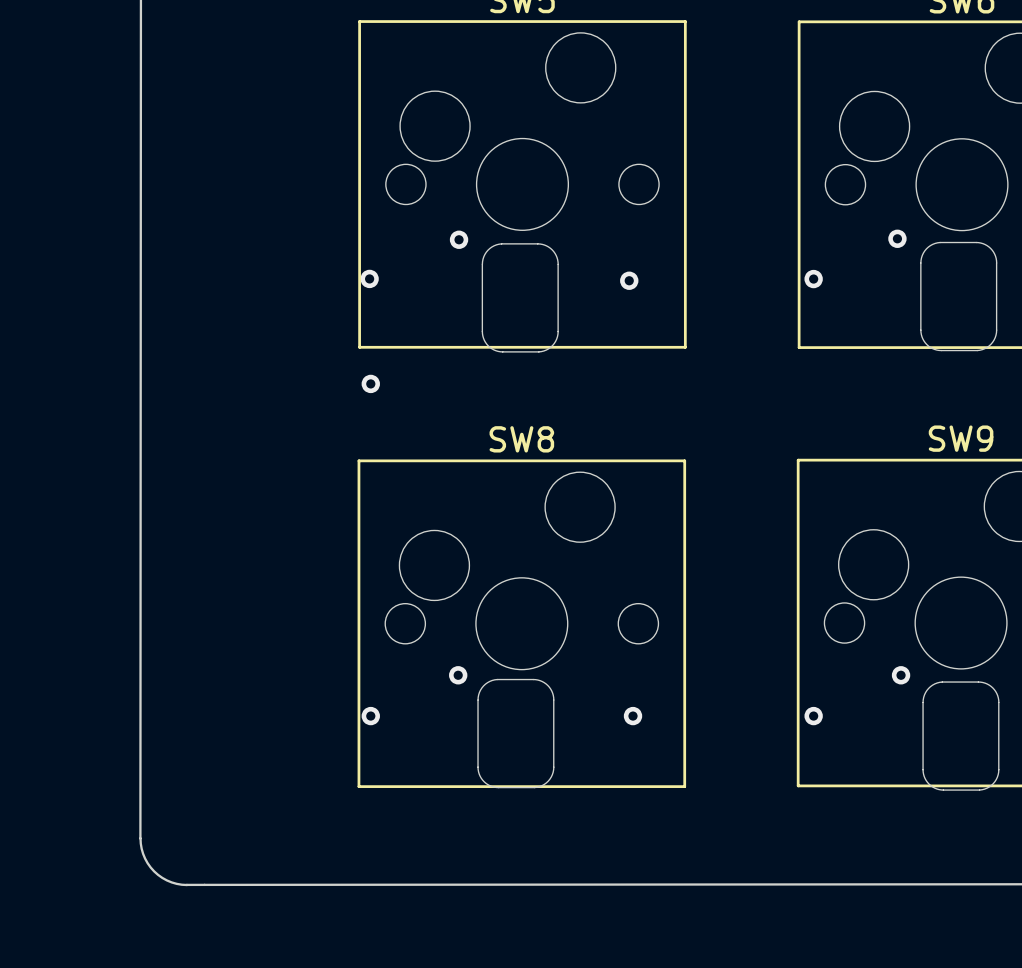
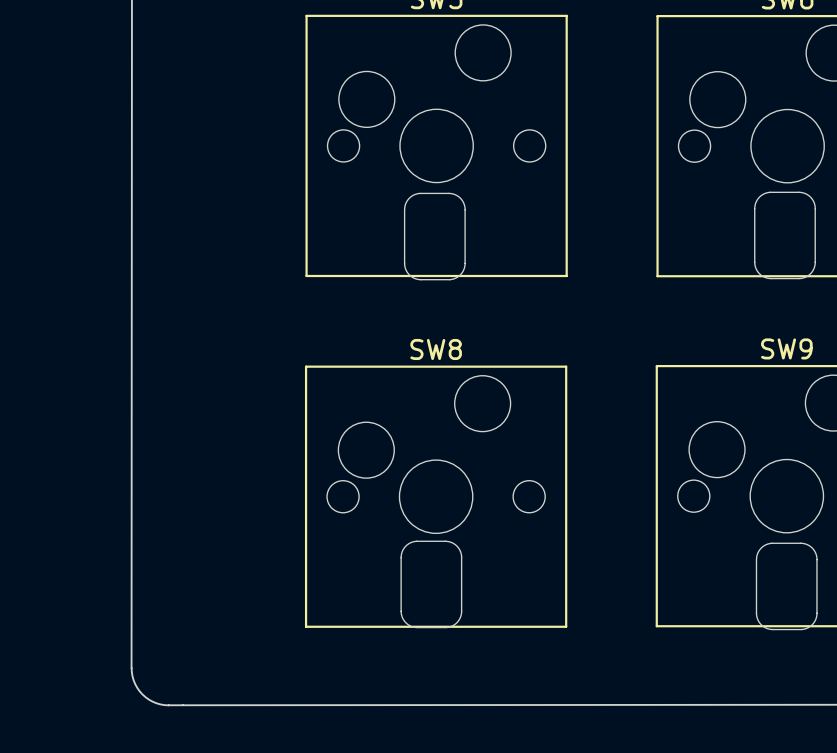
via: (897, 238) -> none
via: (459, 239) -> none
via: (369, 278) -> none
via: (813, 279) -> none
via: (629, 280) -> none
via: (370, 383) -> none
via: (458, 675) -> none
via: (901, 675) -> none
via: (370, 716) -> none
via: (633, 716) -> none
via: (813, 716) -> none

